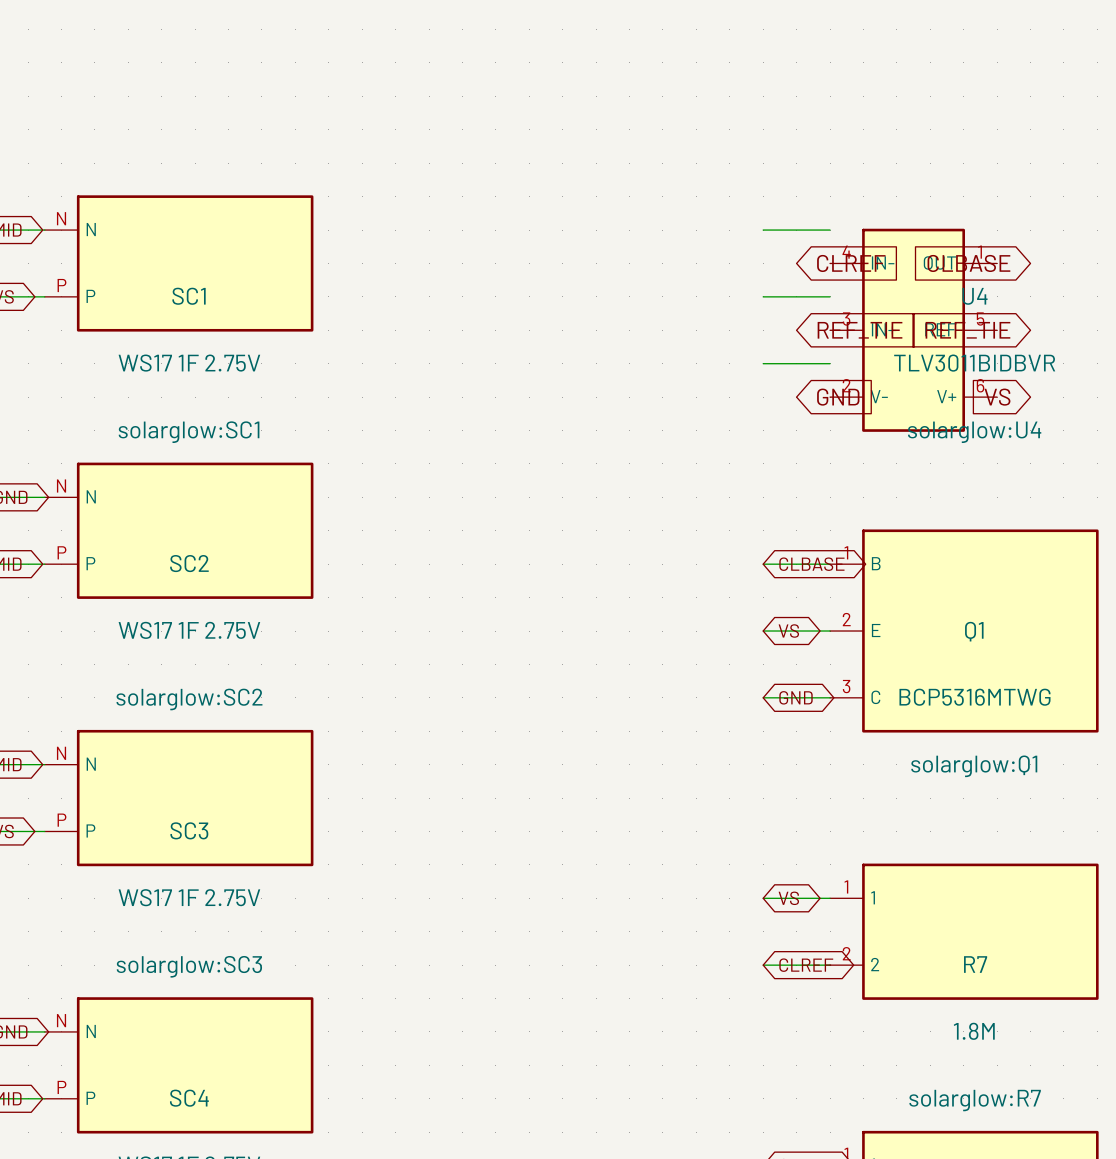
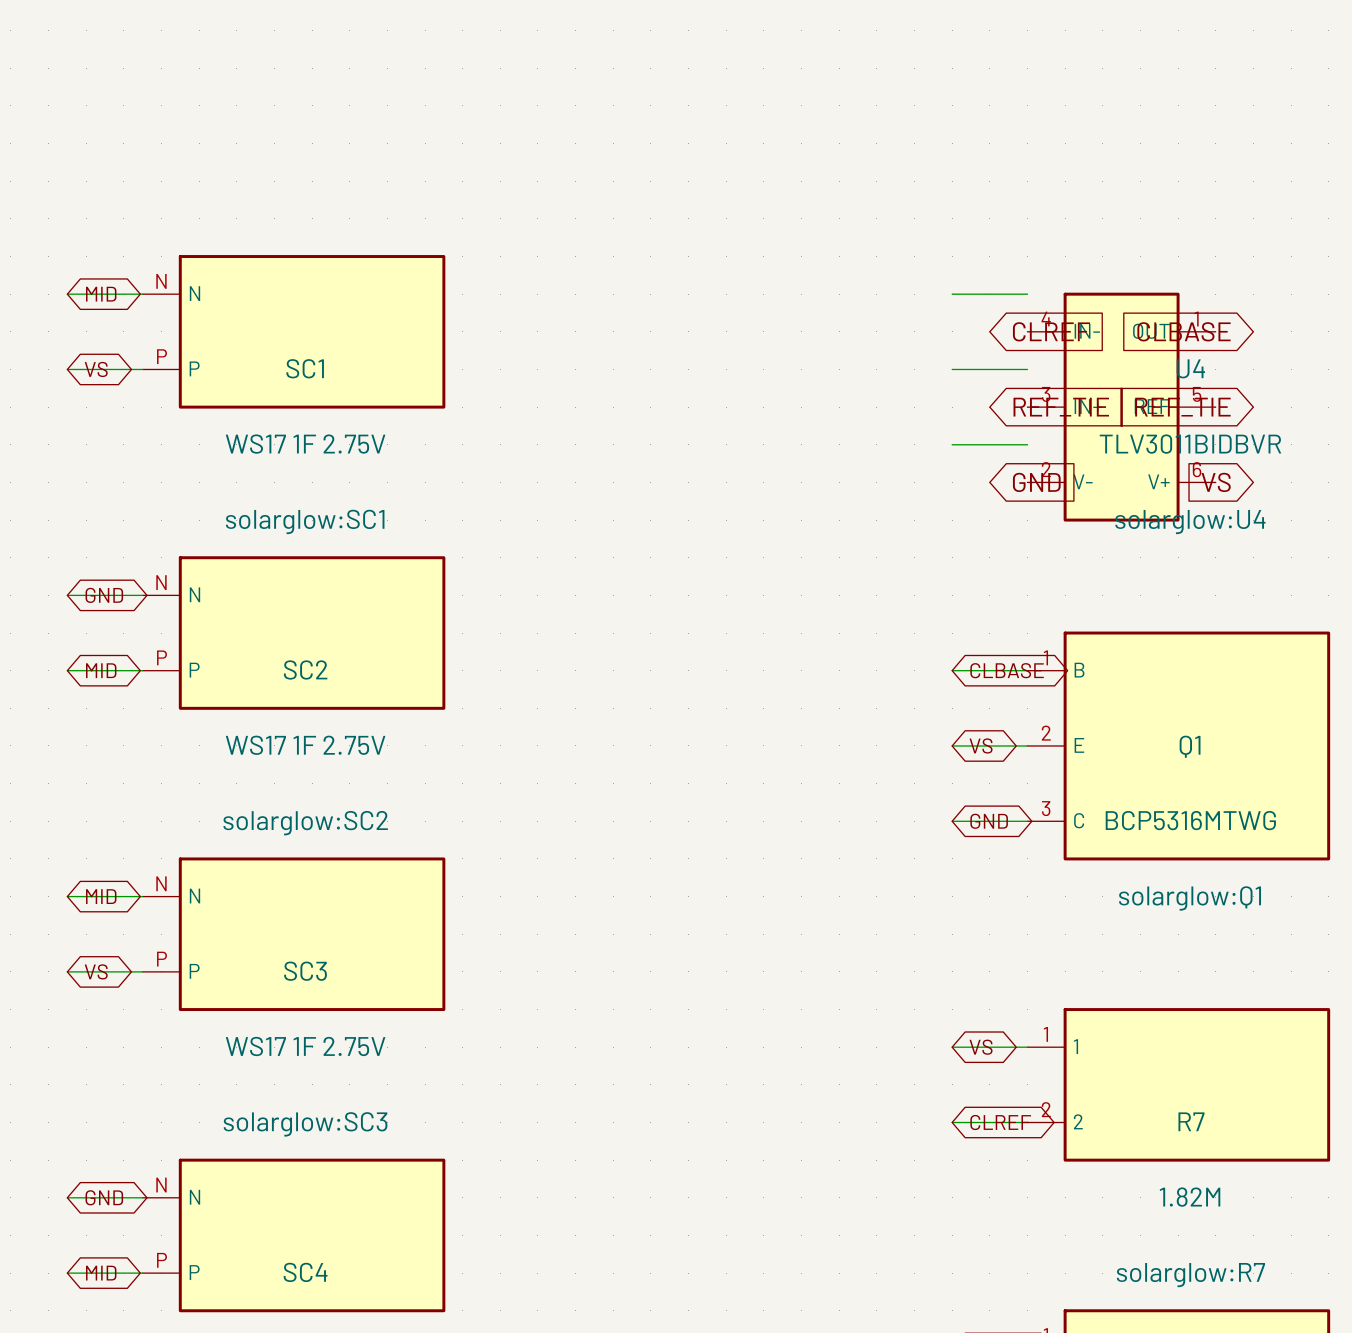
R7 value: 1.8M (974, 1031) -> 1.82M (1190, 1197)

